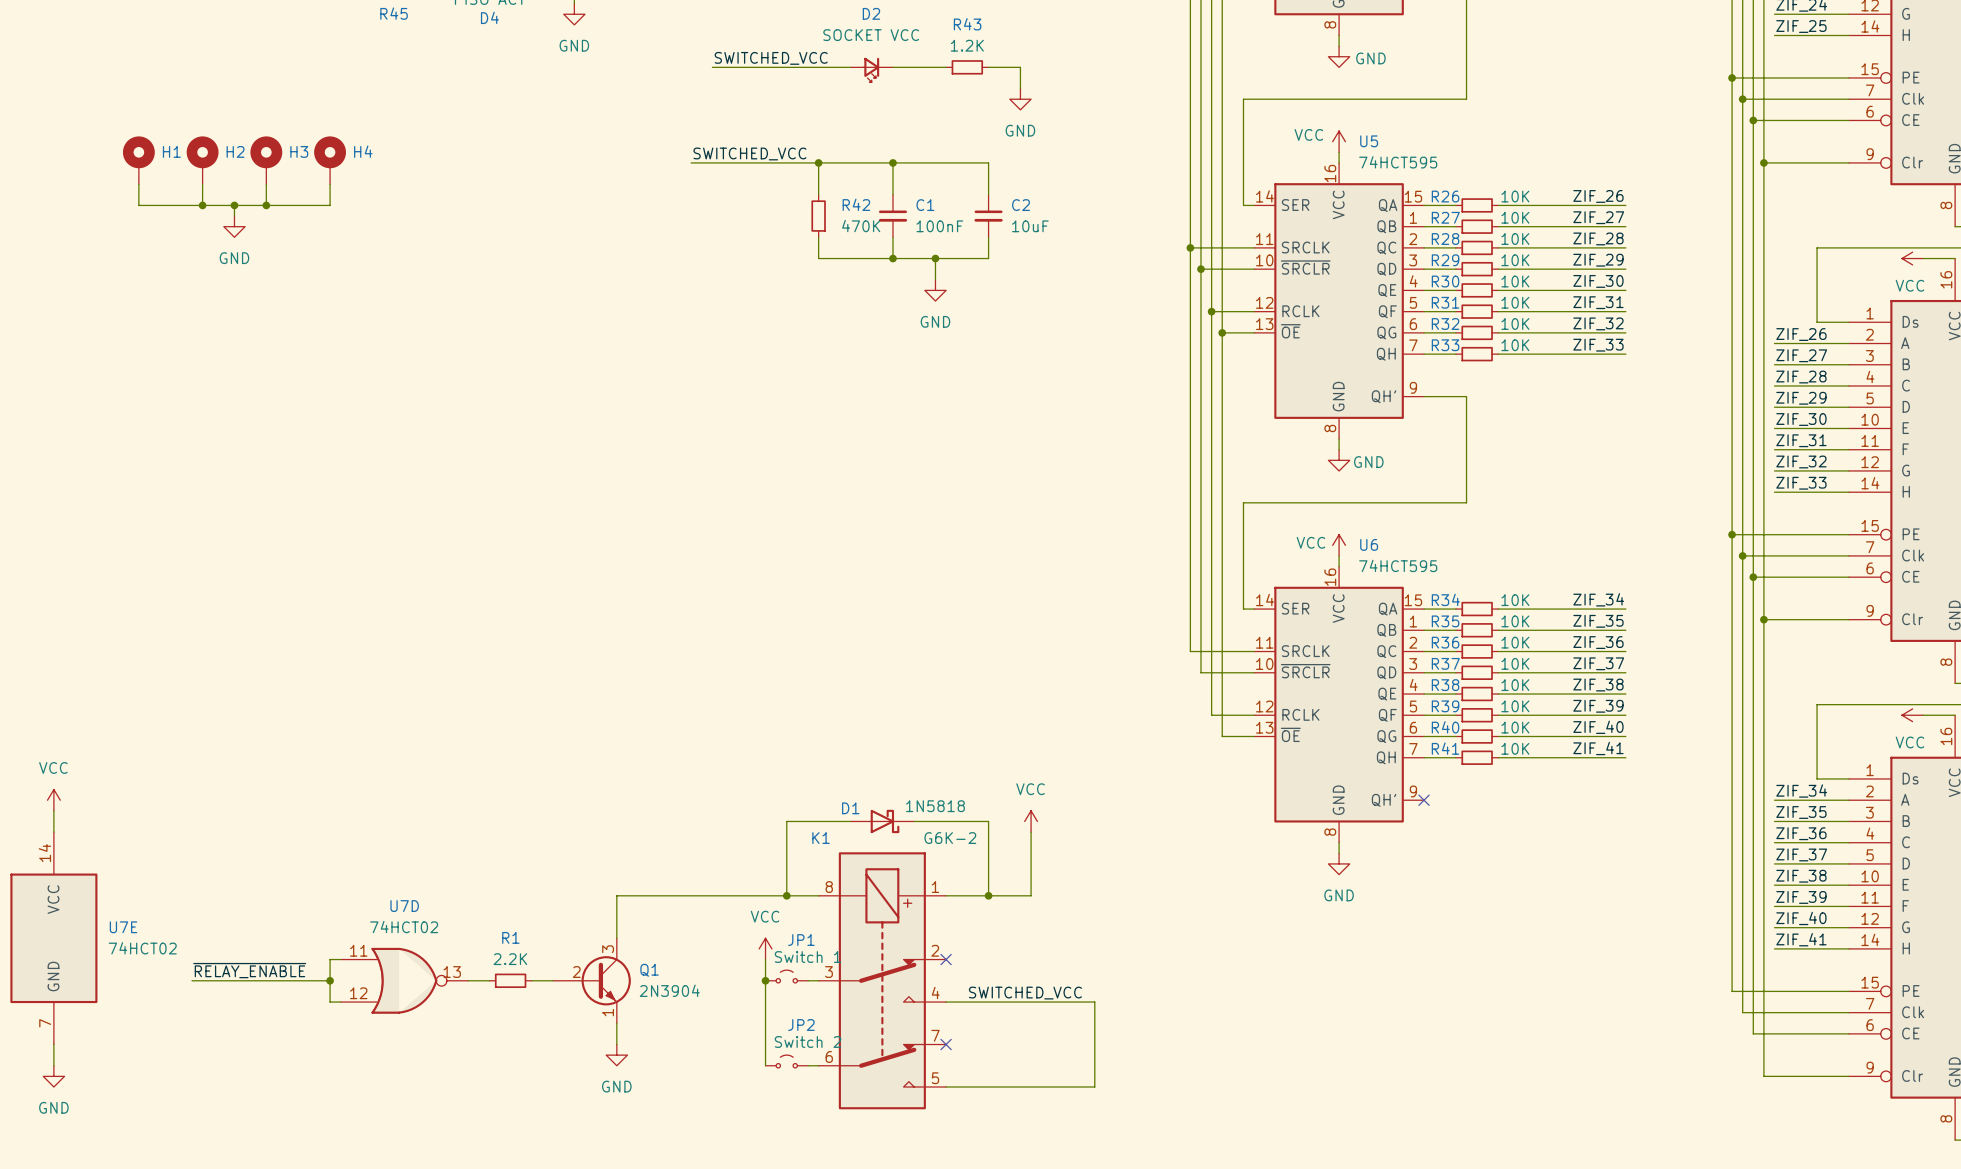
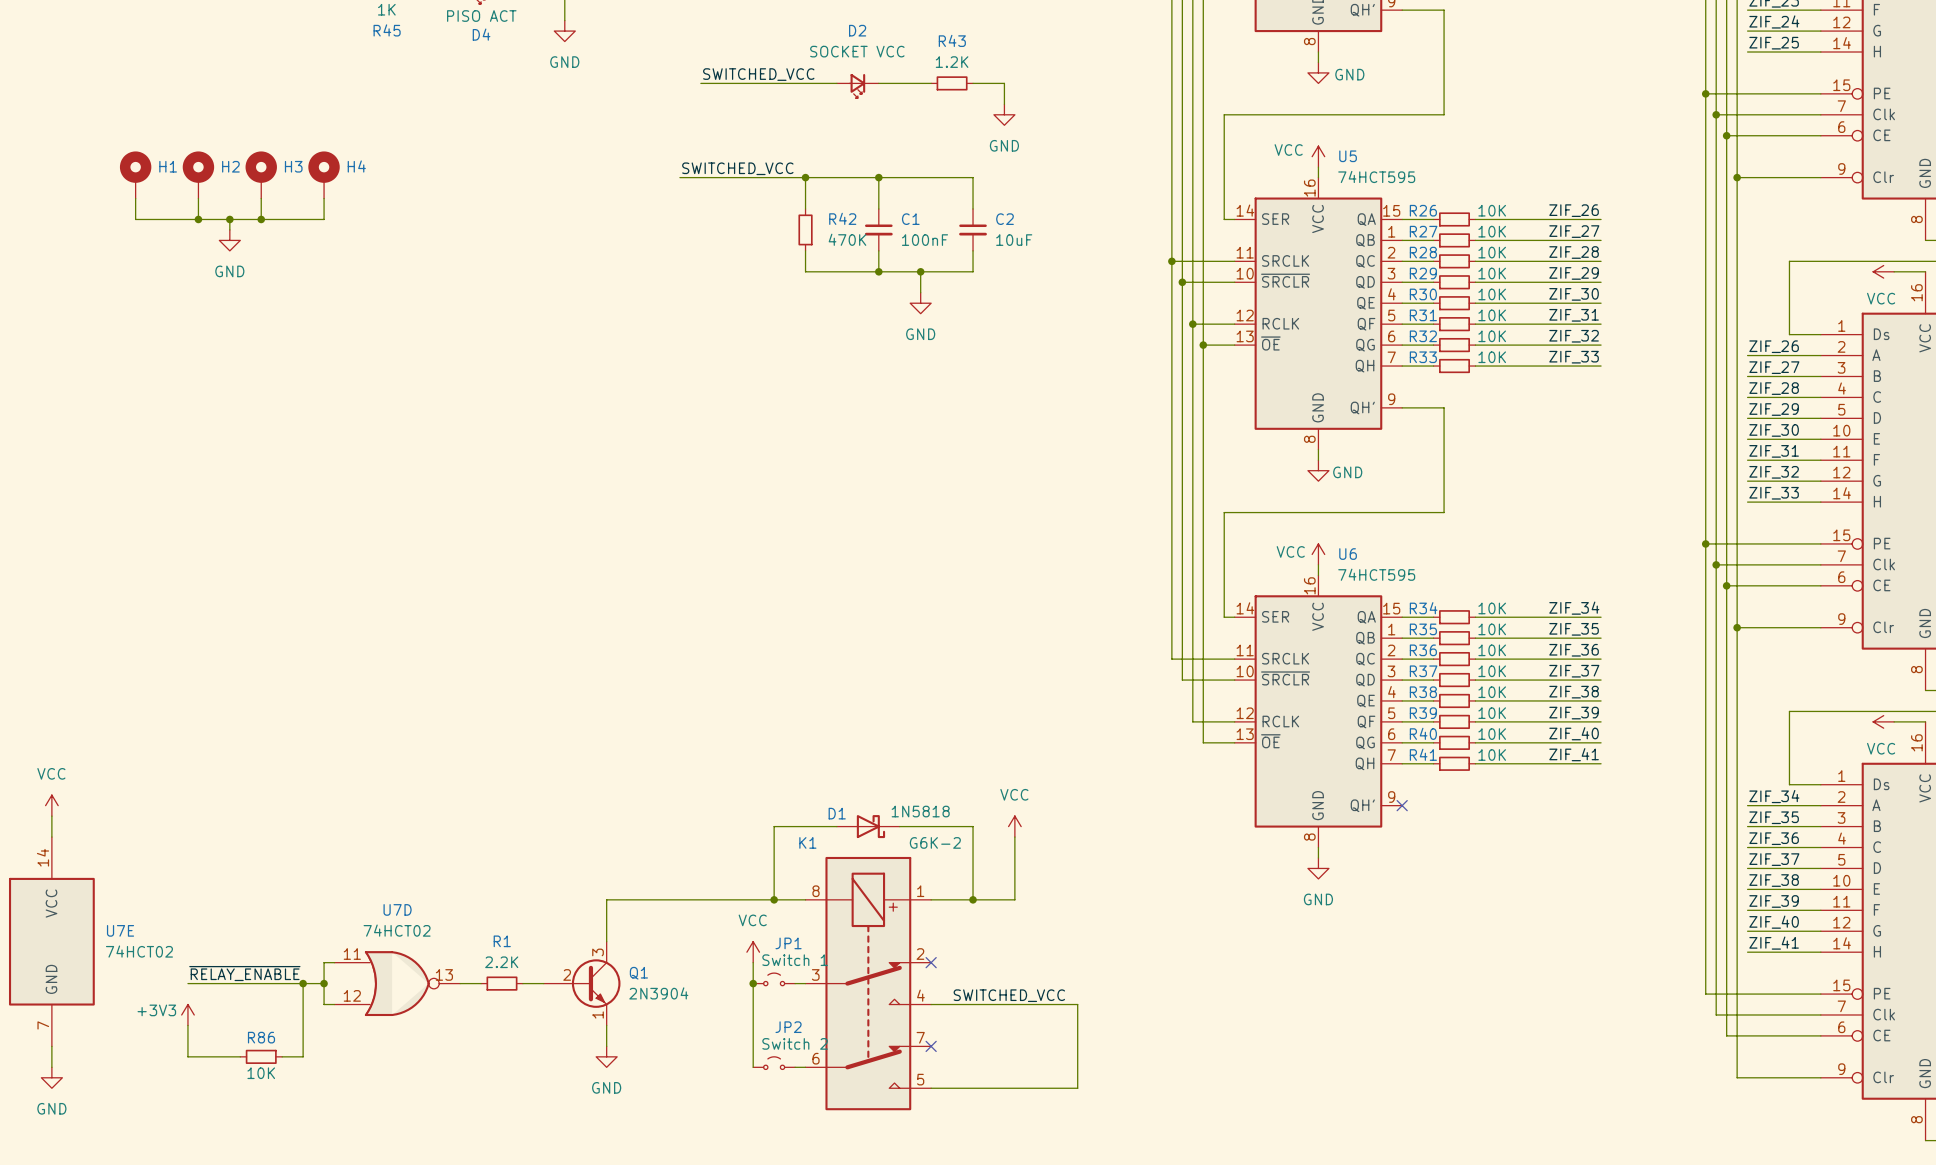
wire: none -> (303, 983) (303, 1056) (282, 1056)
junction: none -> (303, 983)
power symbol: none -> +3V3 (187, 1014)
wire: none -> (187, 1025) (187, 1056) (240, 1056)
R86: none -> 10K (261, 1056)

